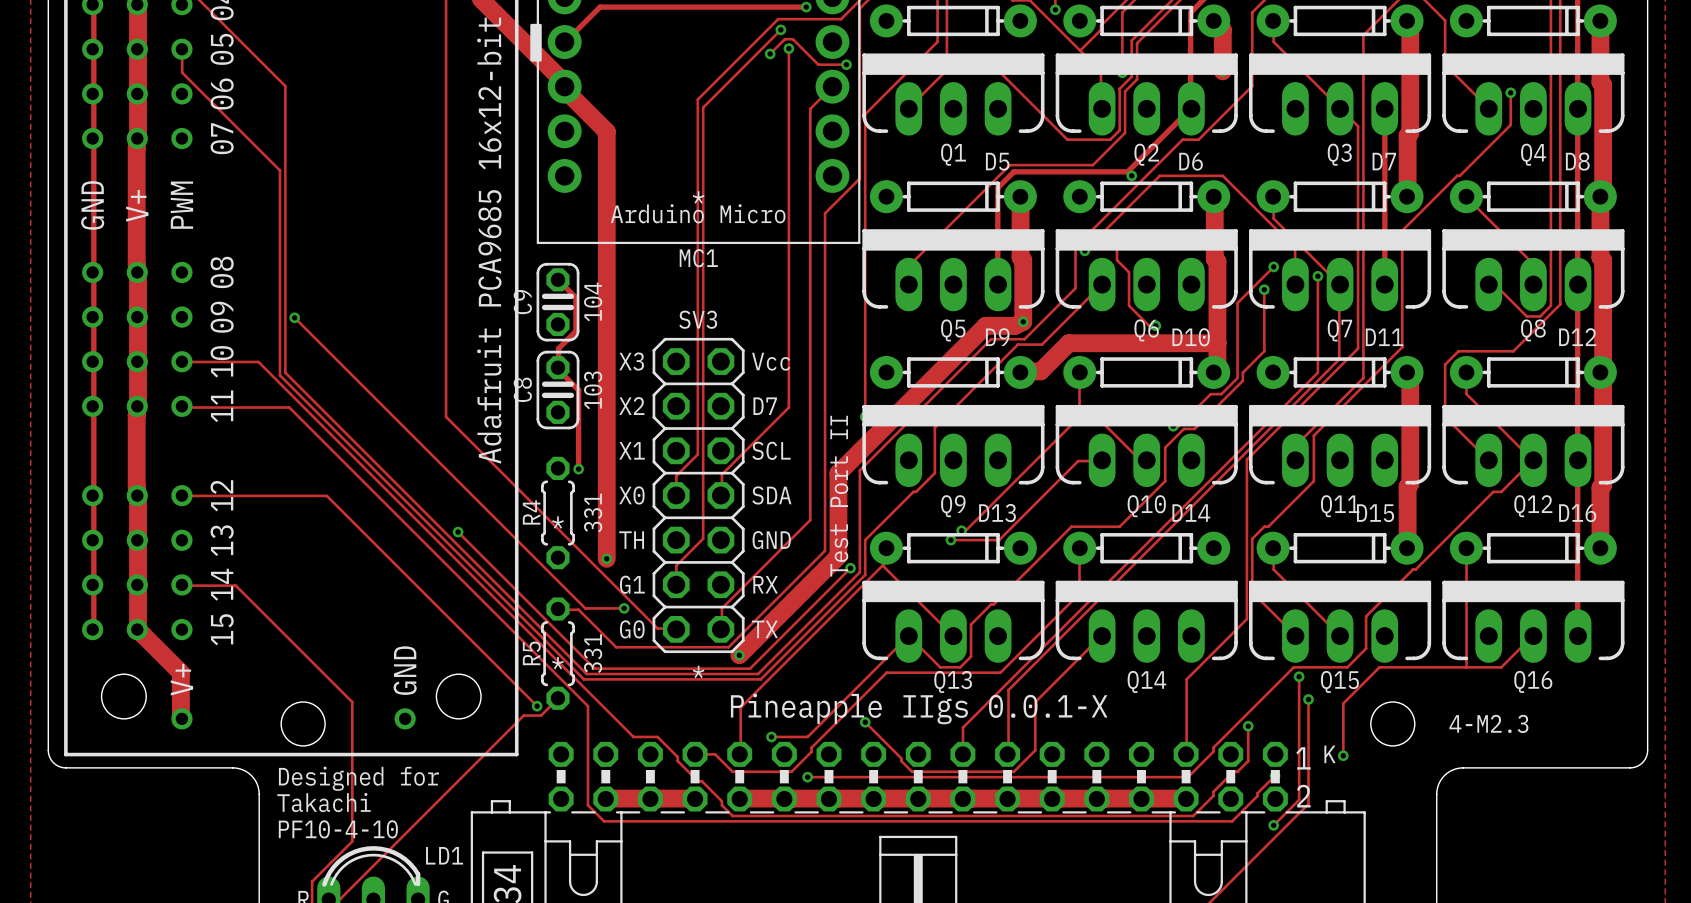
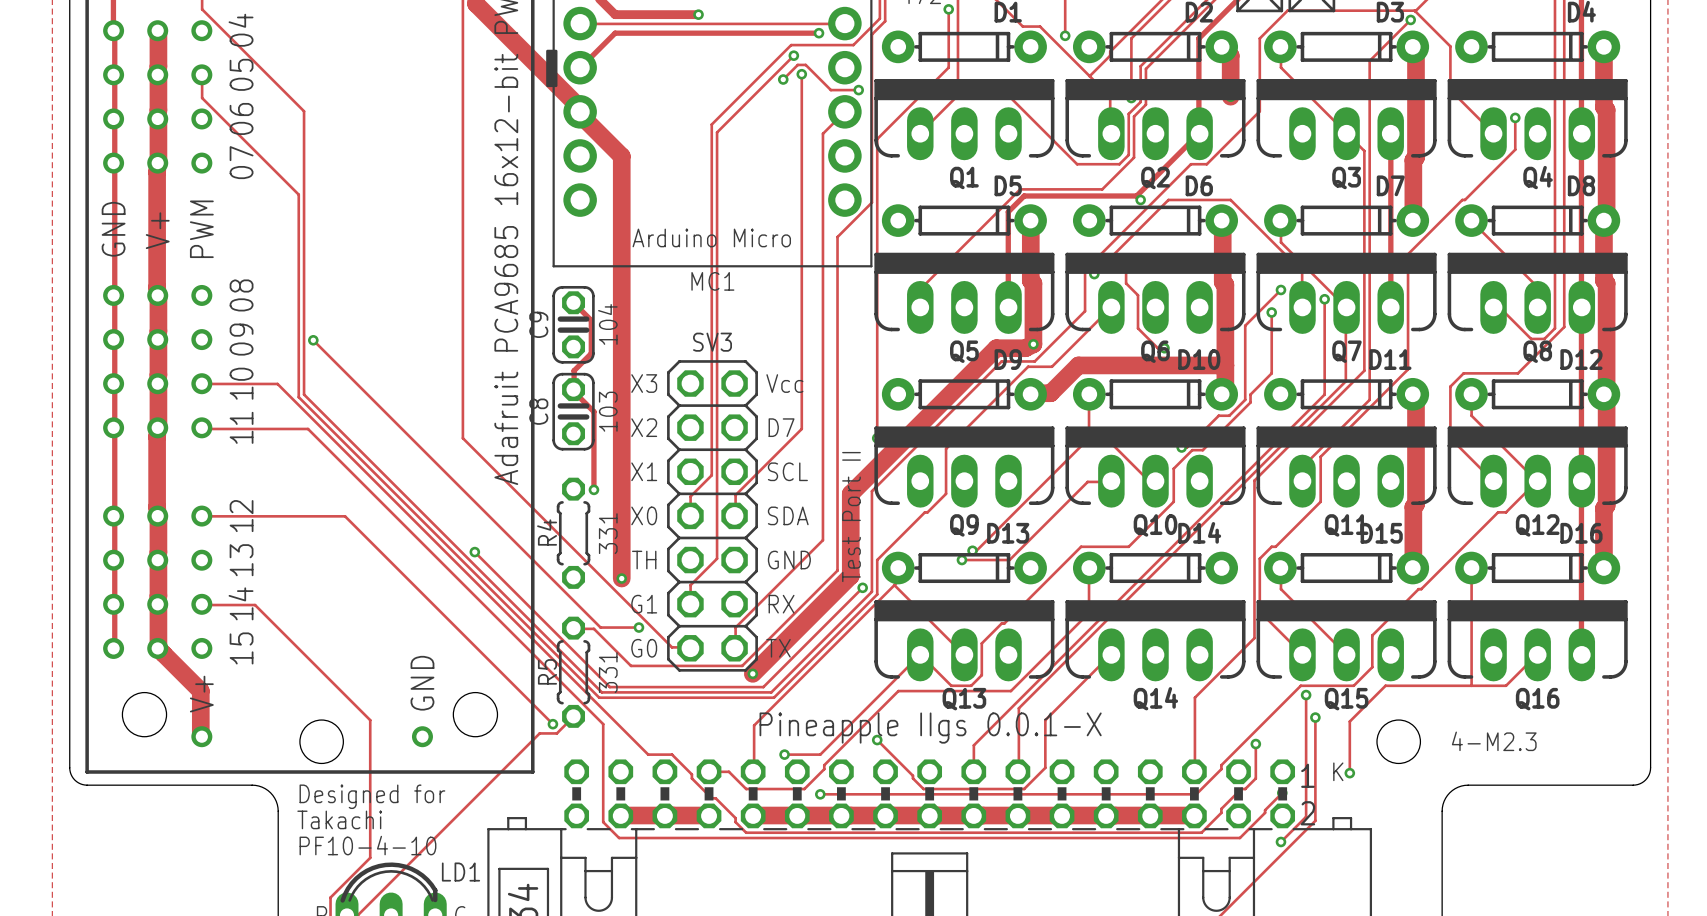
text: * (698, 197) -> none
text: * (557, 522) -> none
text: * (557, 663) -> none
text: * (698, 671) -> none

